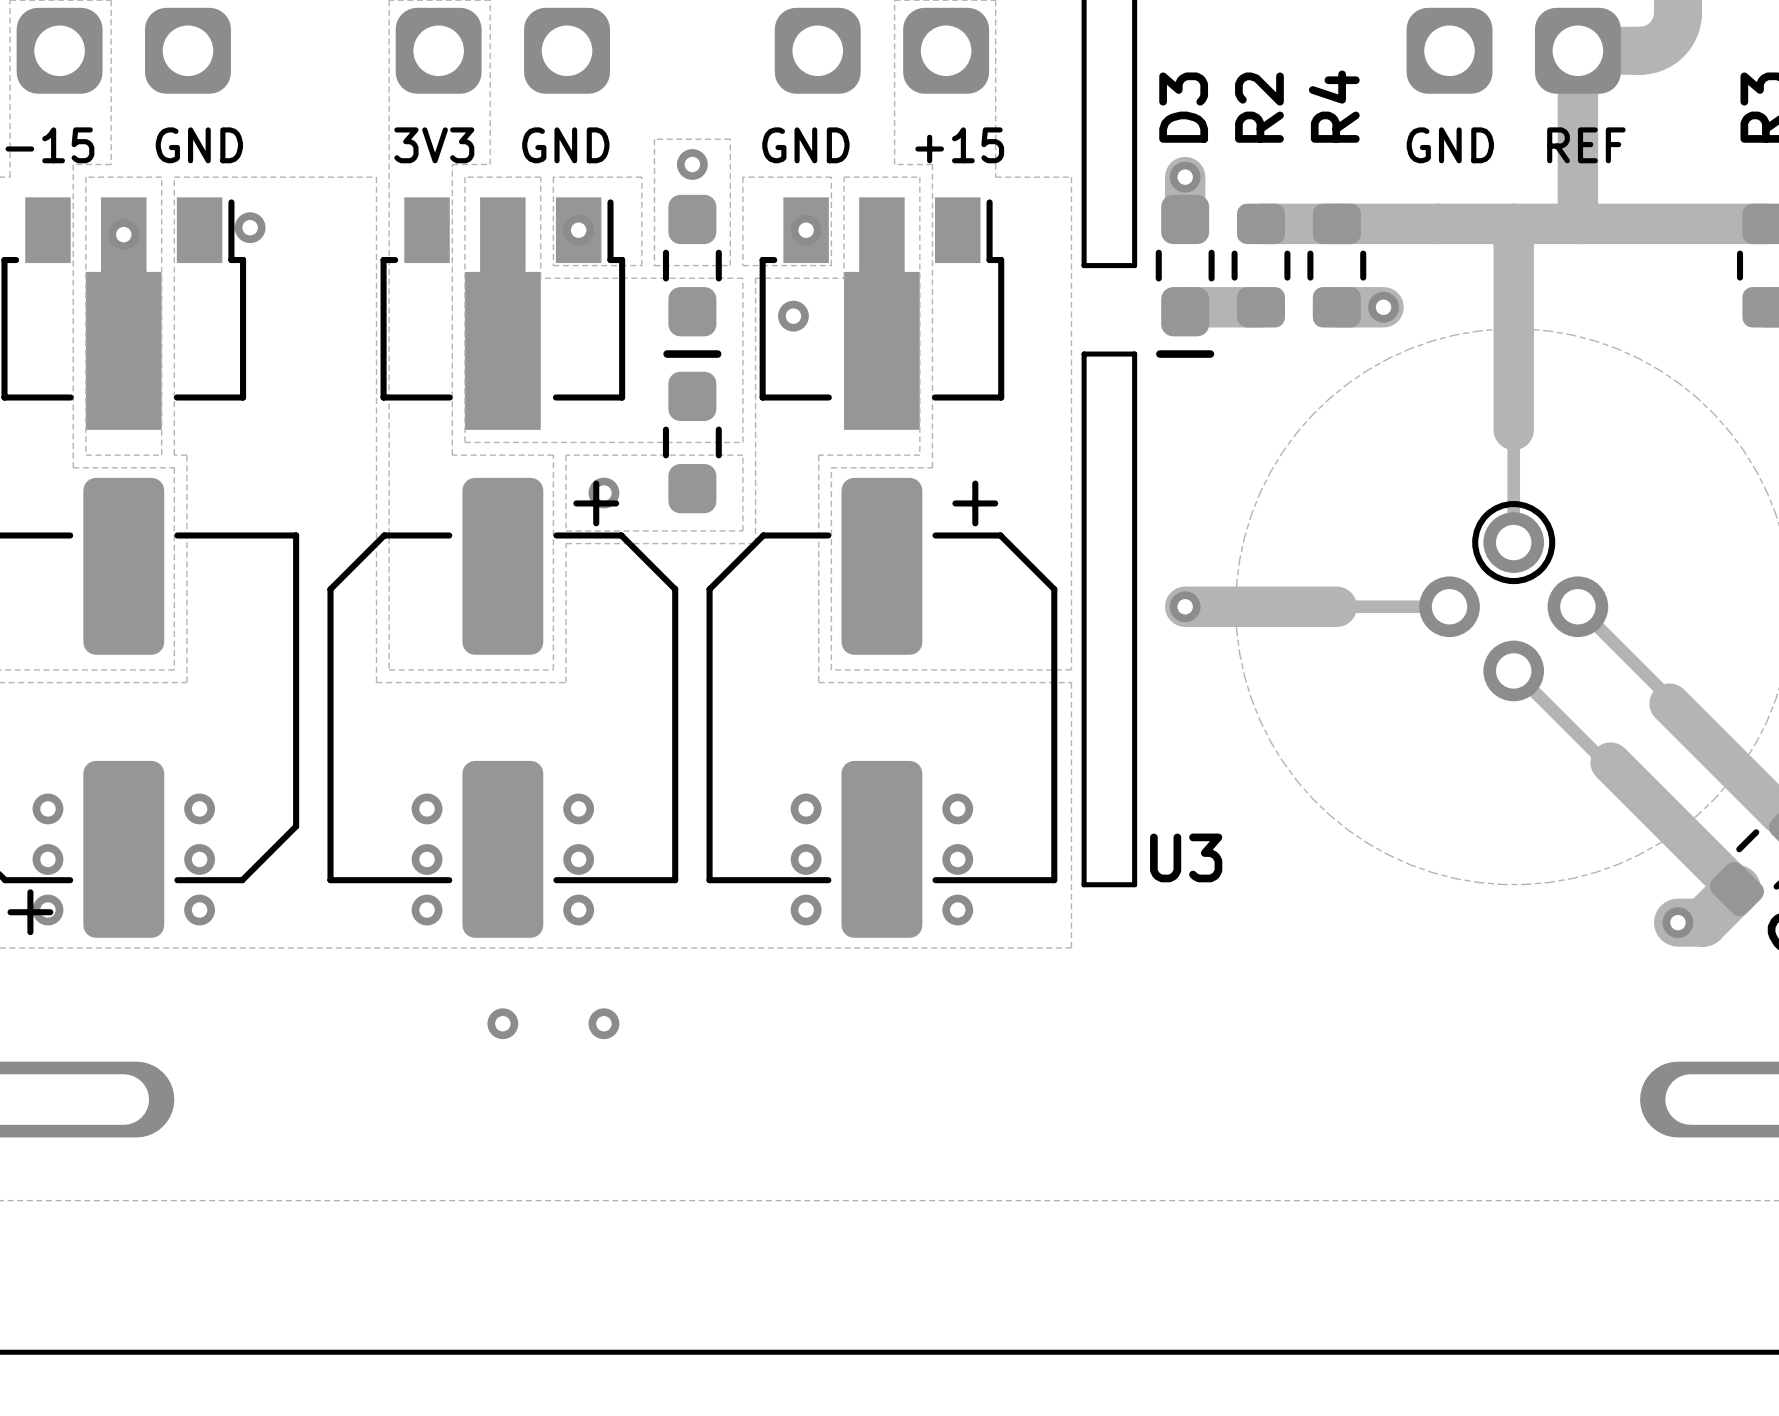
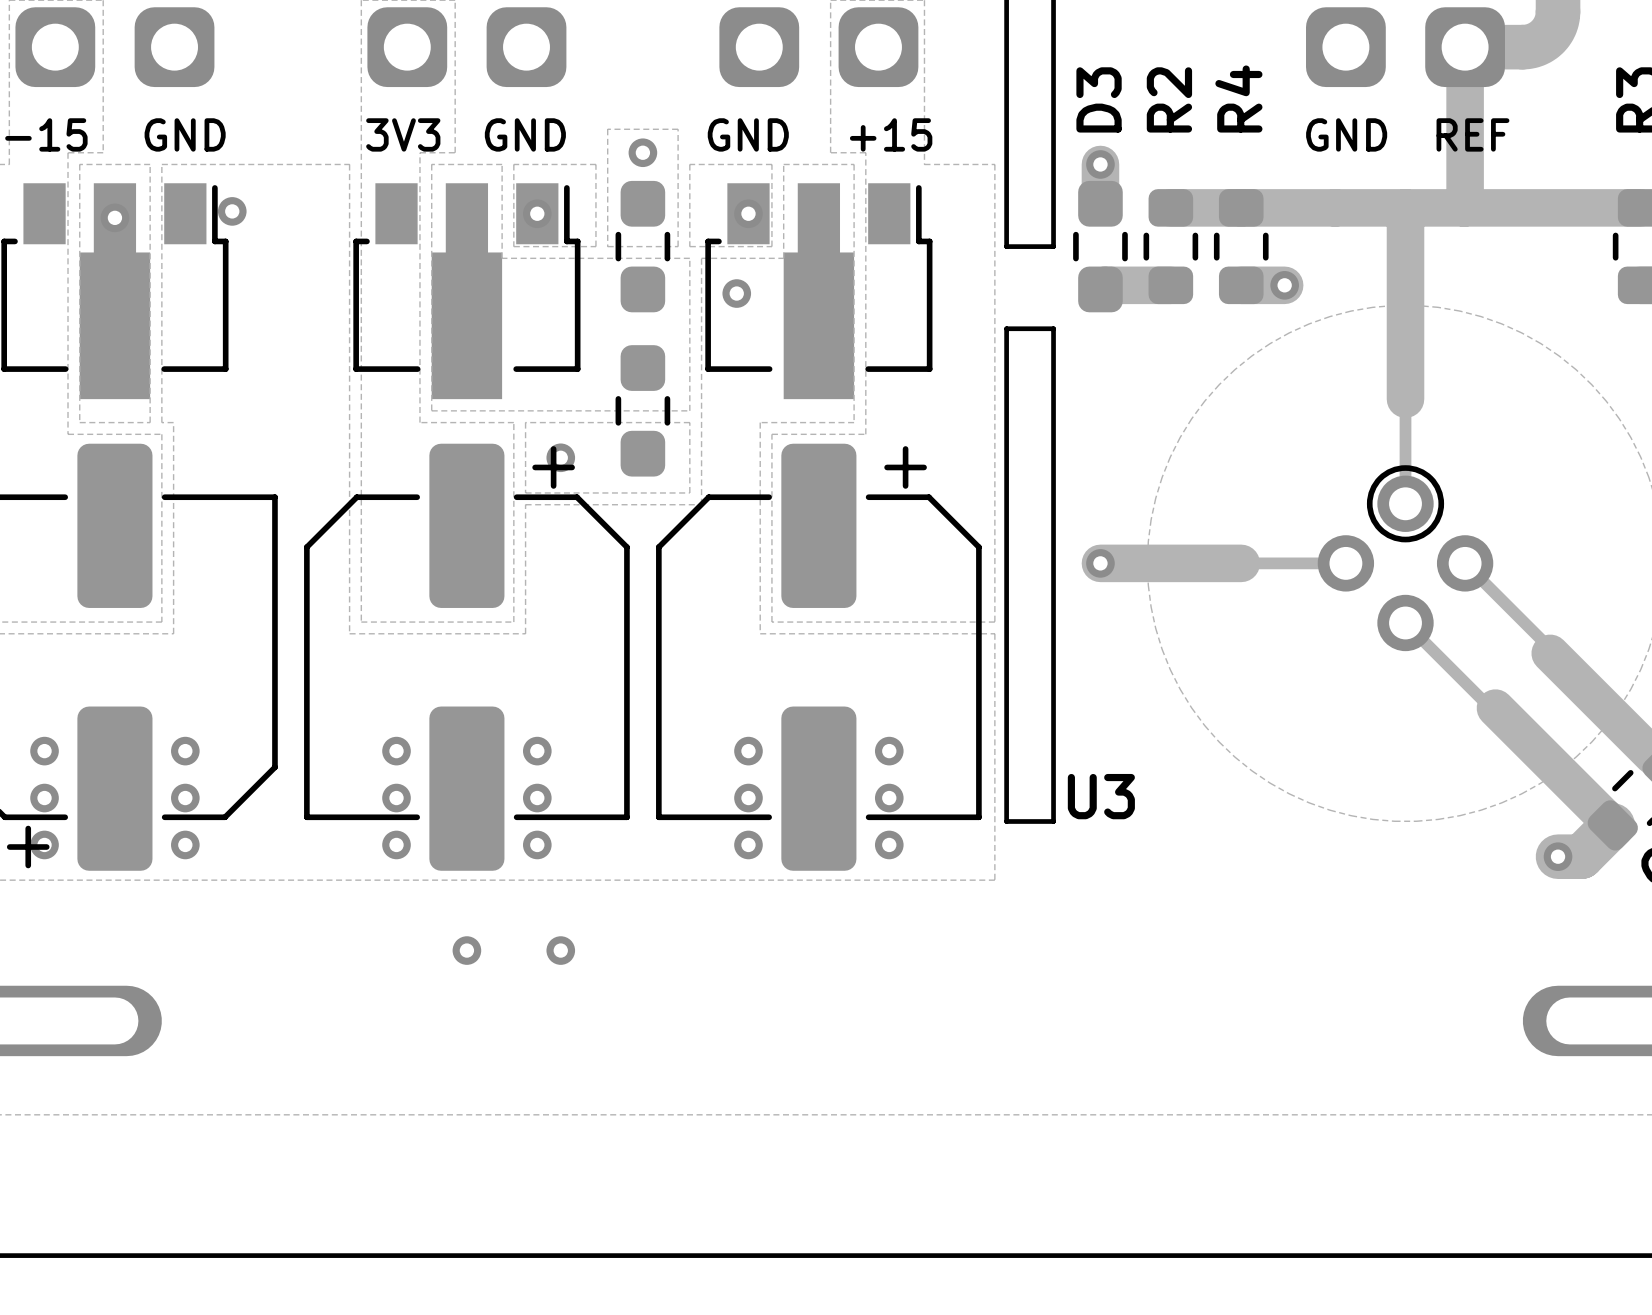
line: (667, 354) (717, 354) -> none
line: (1159, 354) (1210, 354) -> none

